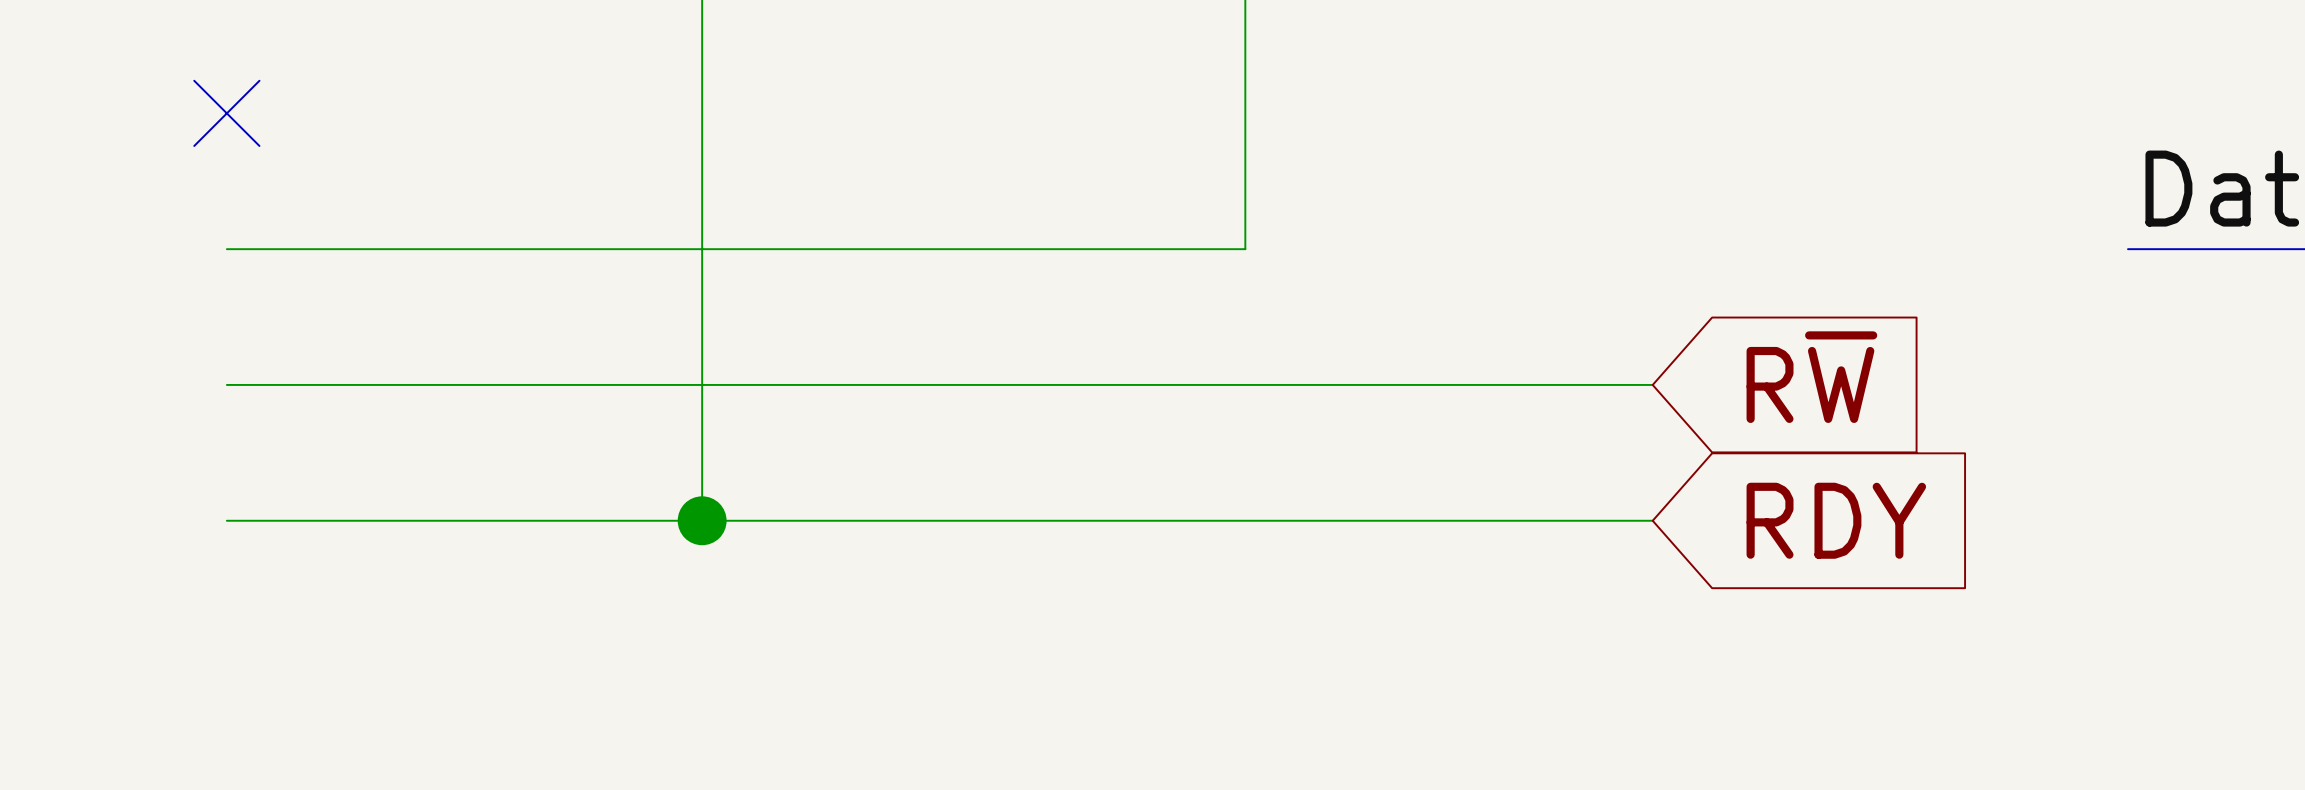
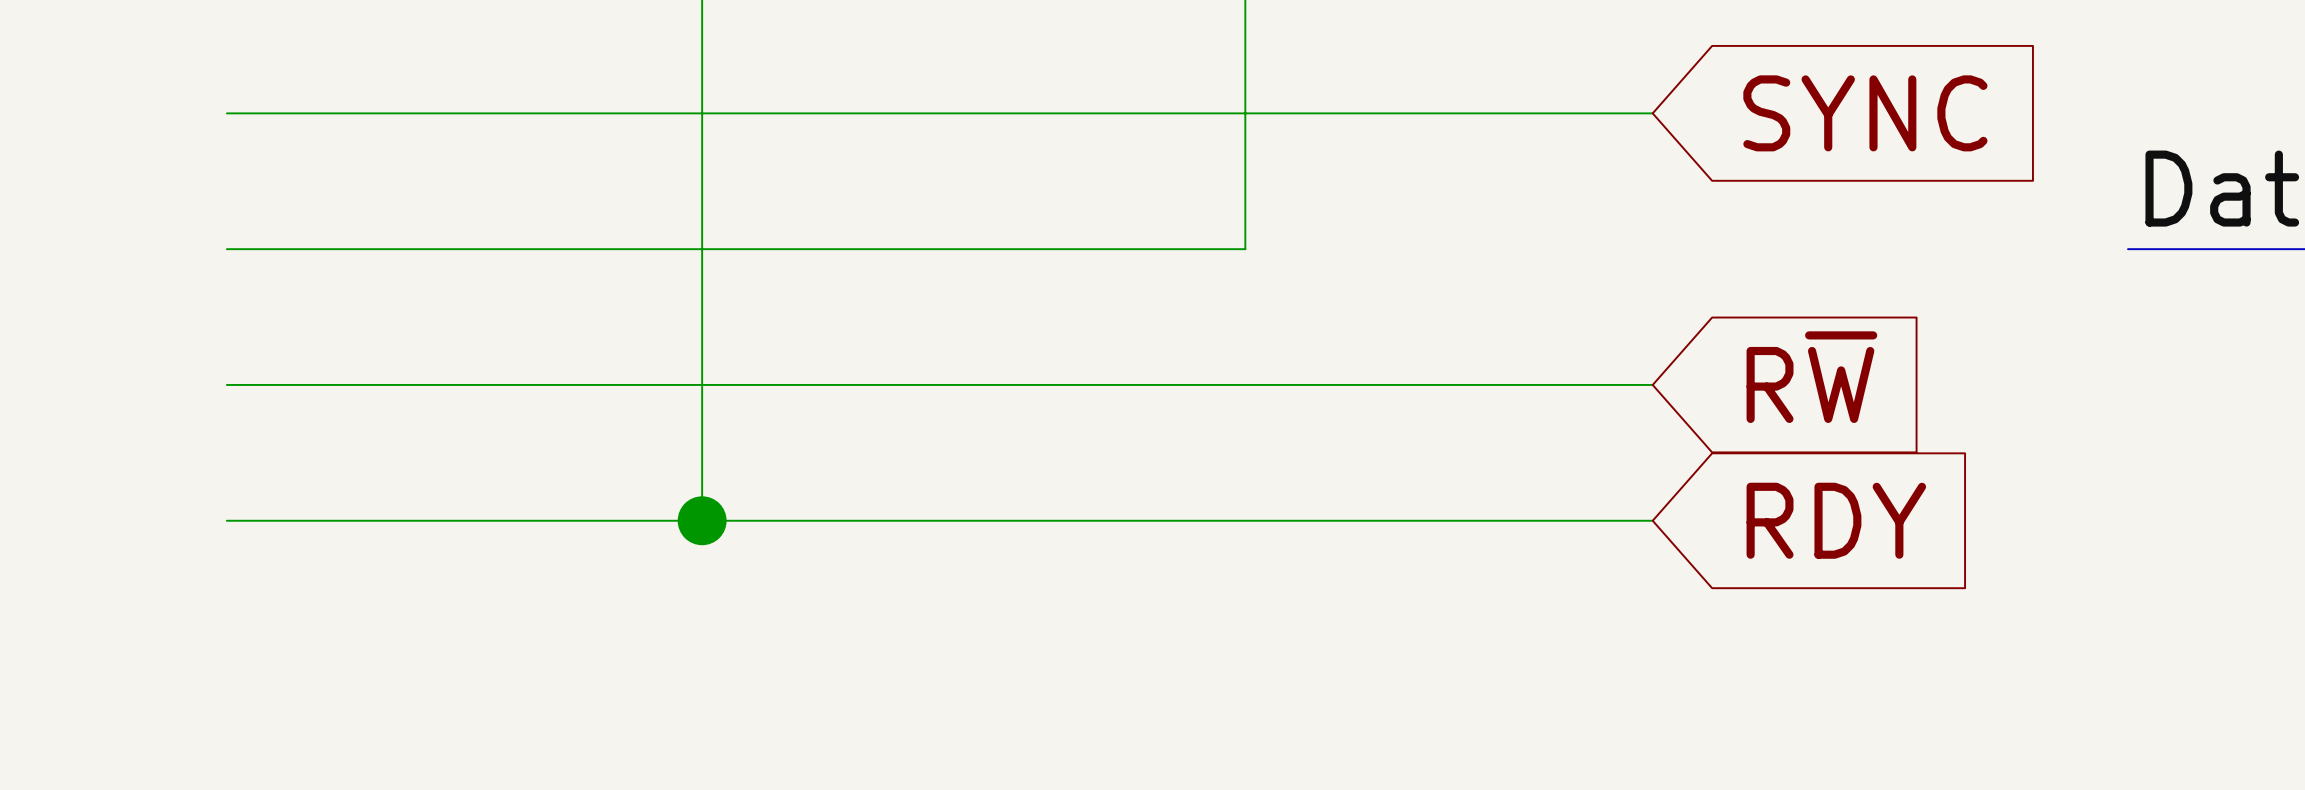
wire: none -> (226, 113) (1652, 113)
no-connect mark: (226, 113) -> none
global label: none -> SYNC (1865, 113)

